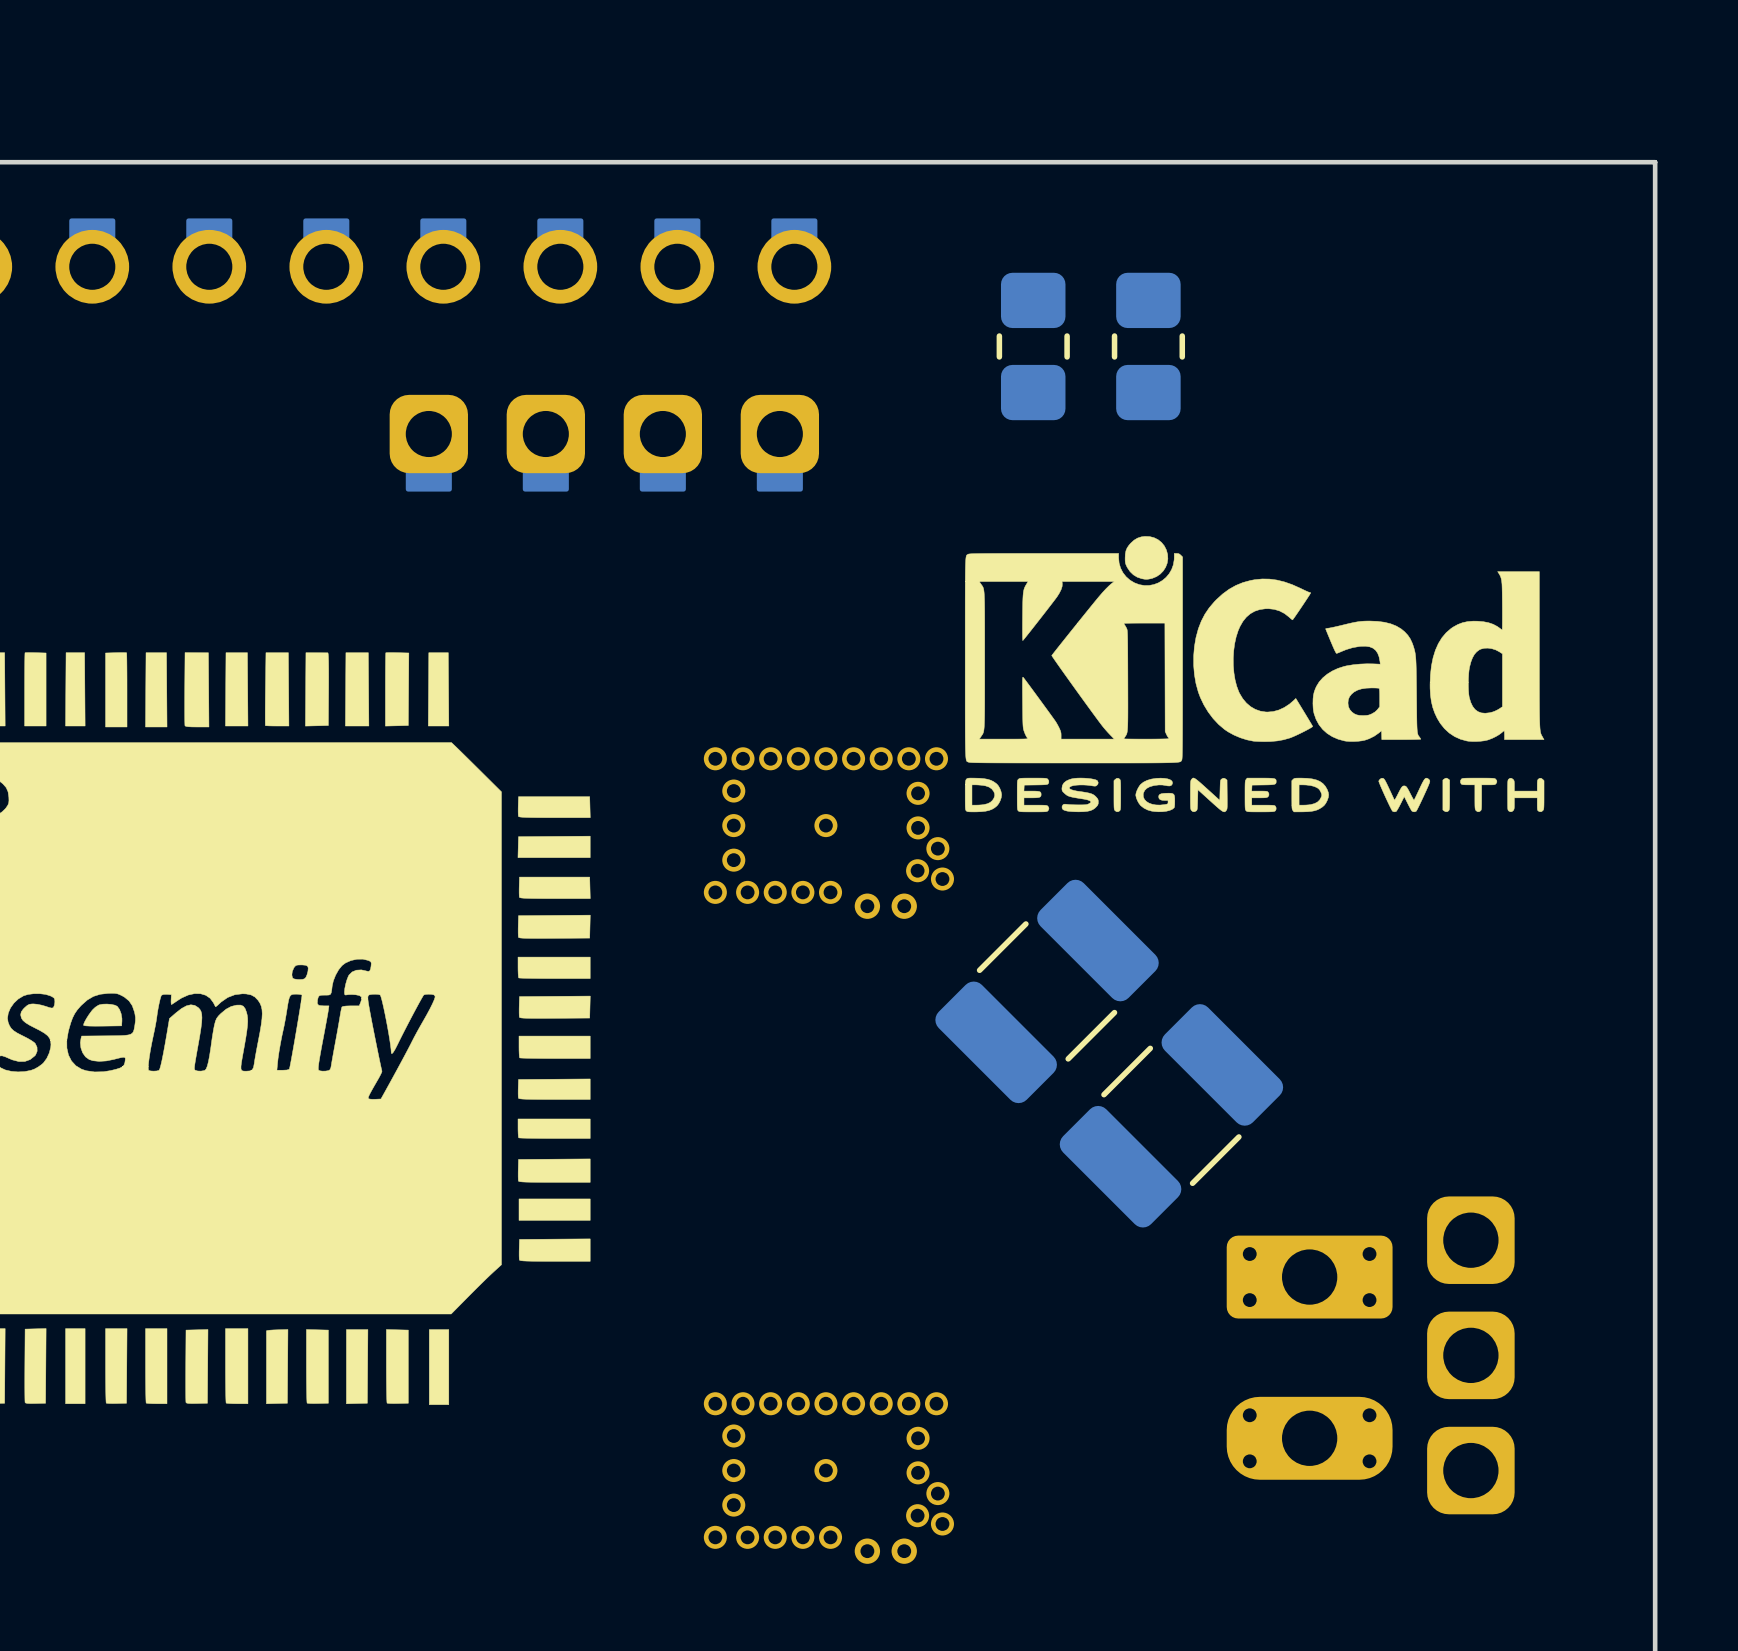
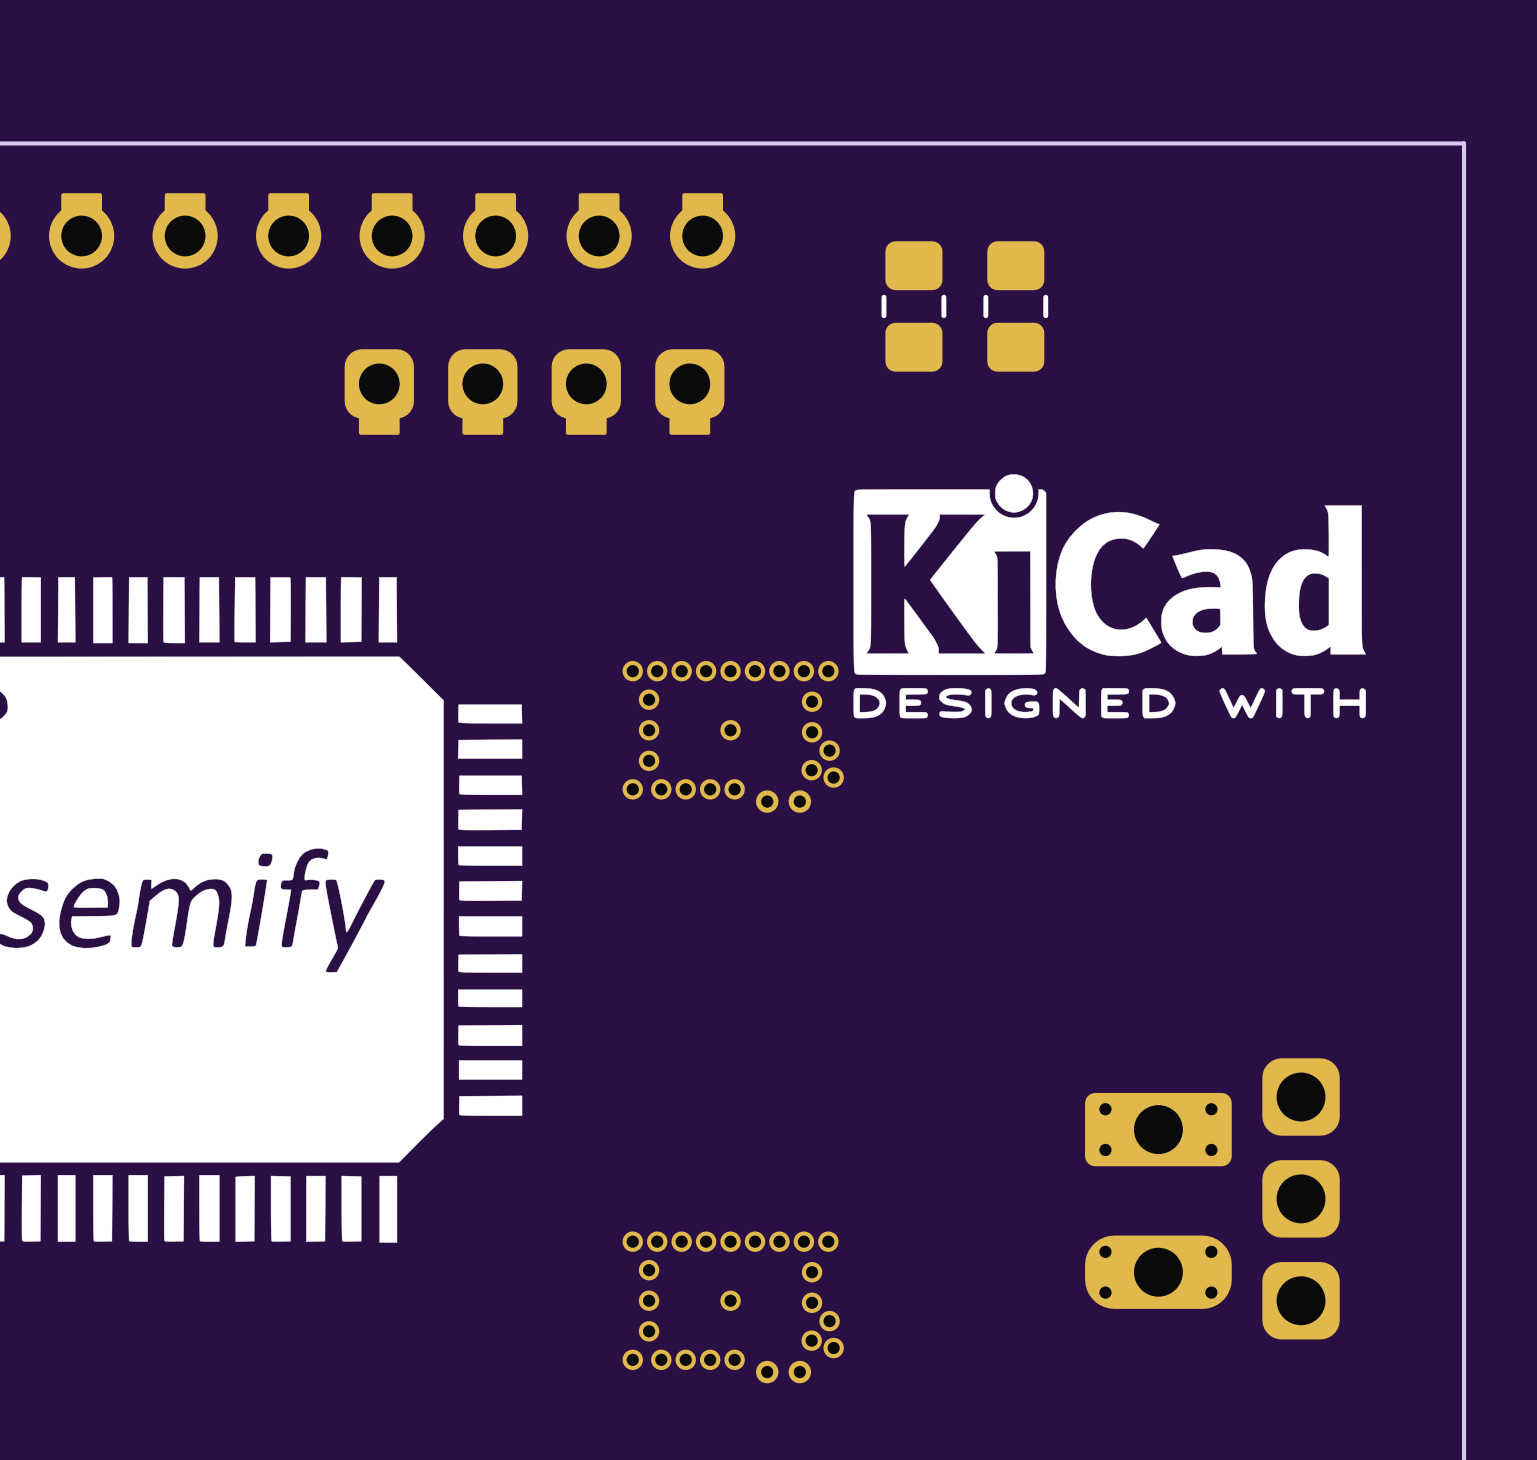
part: (1047, 991) -> none
part: (1171, 1115) -> none

